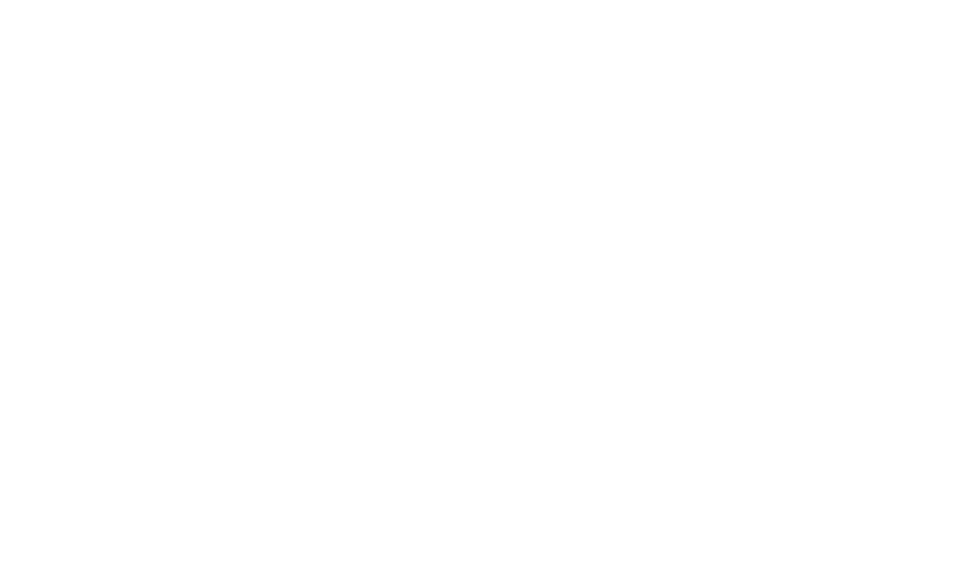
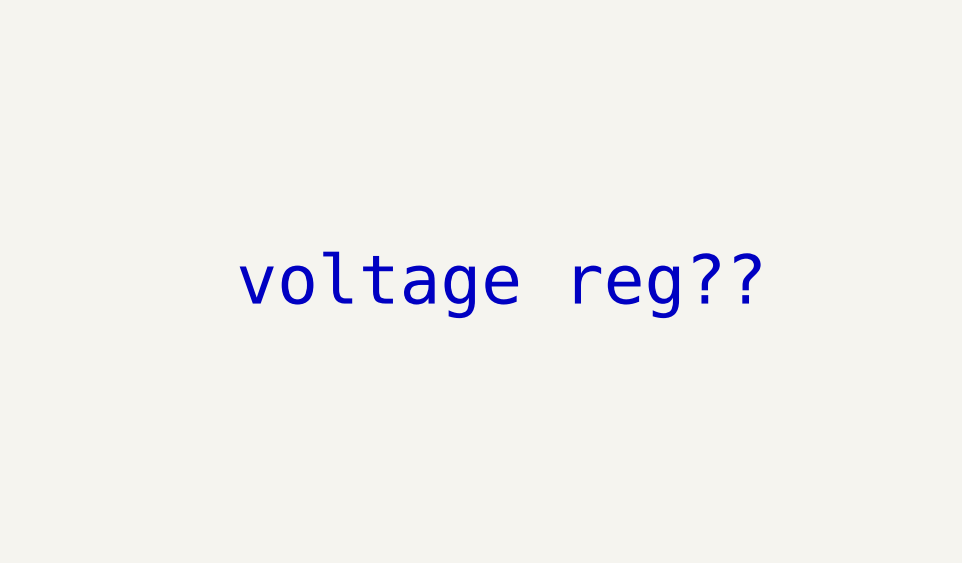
text: none -> voltage reg?? (500, 284)

